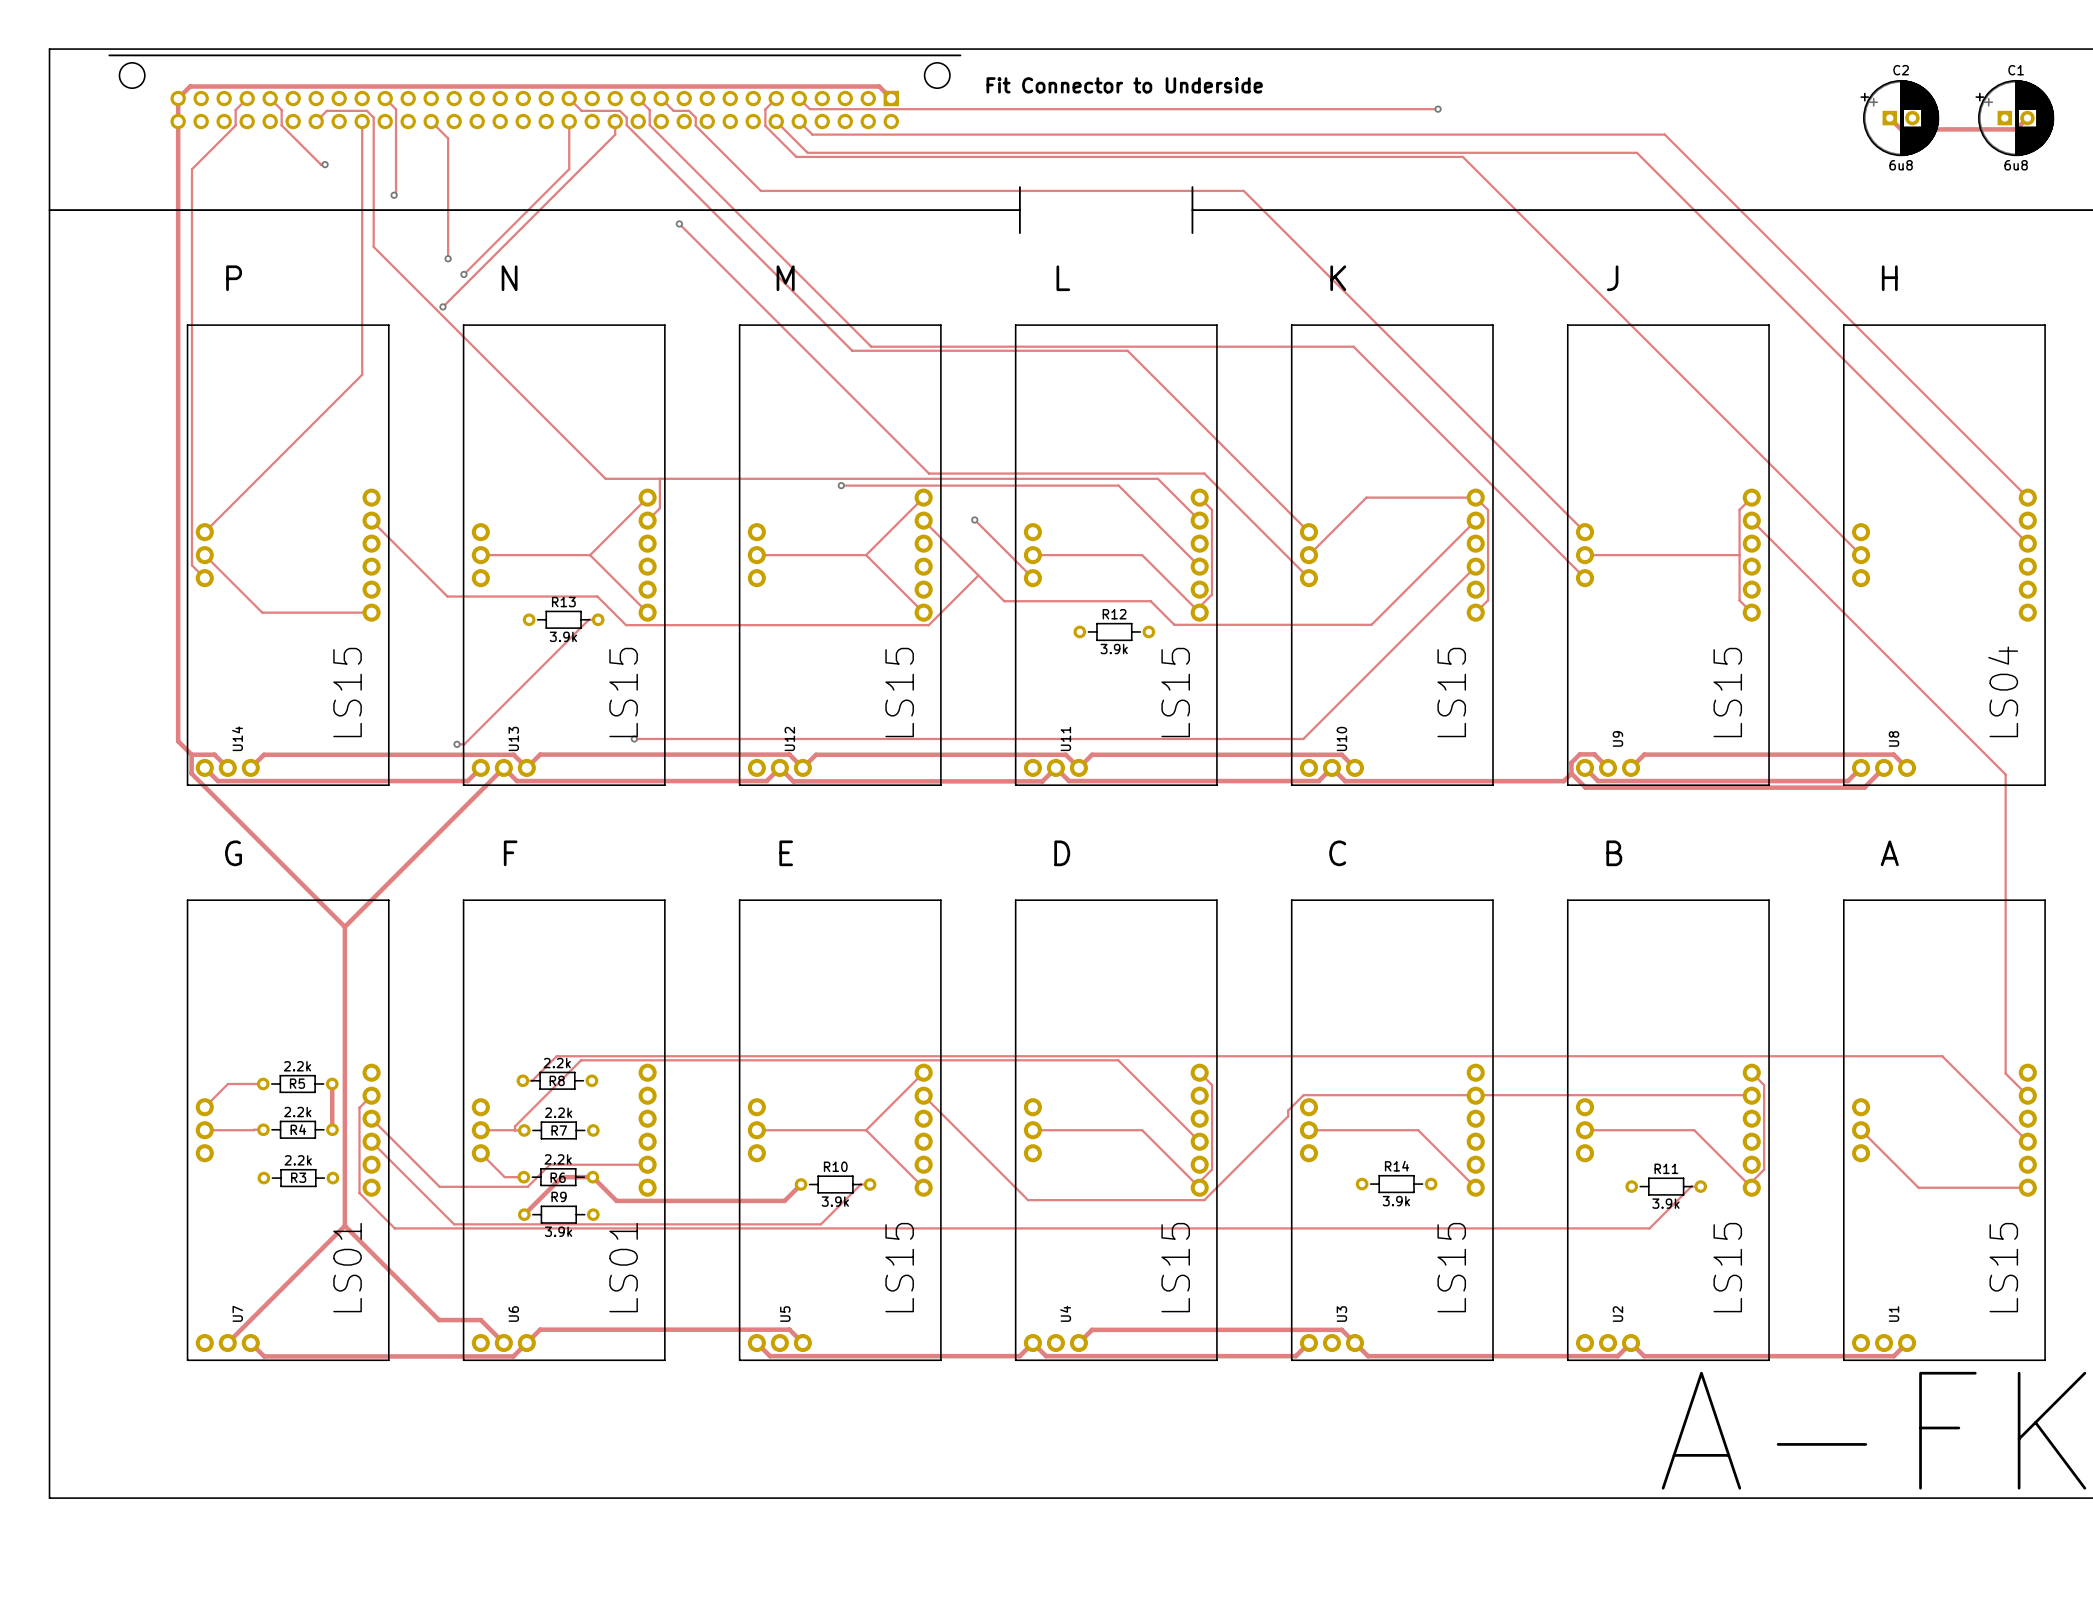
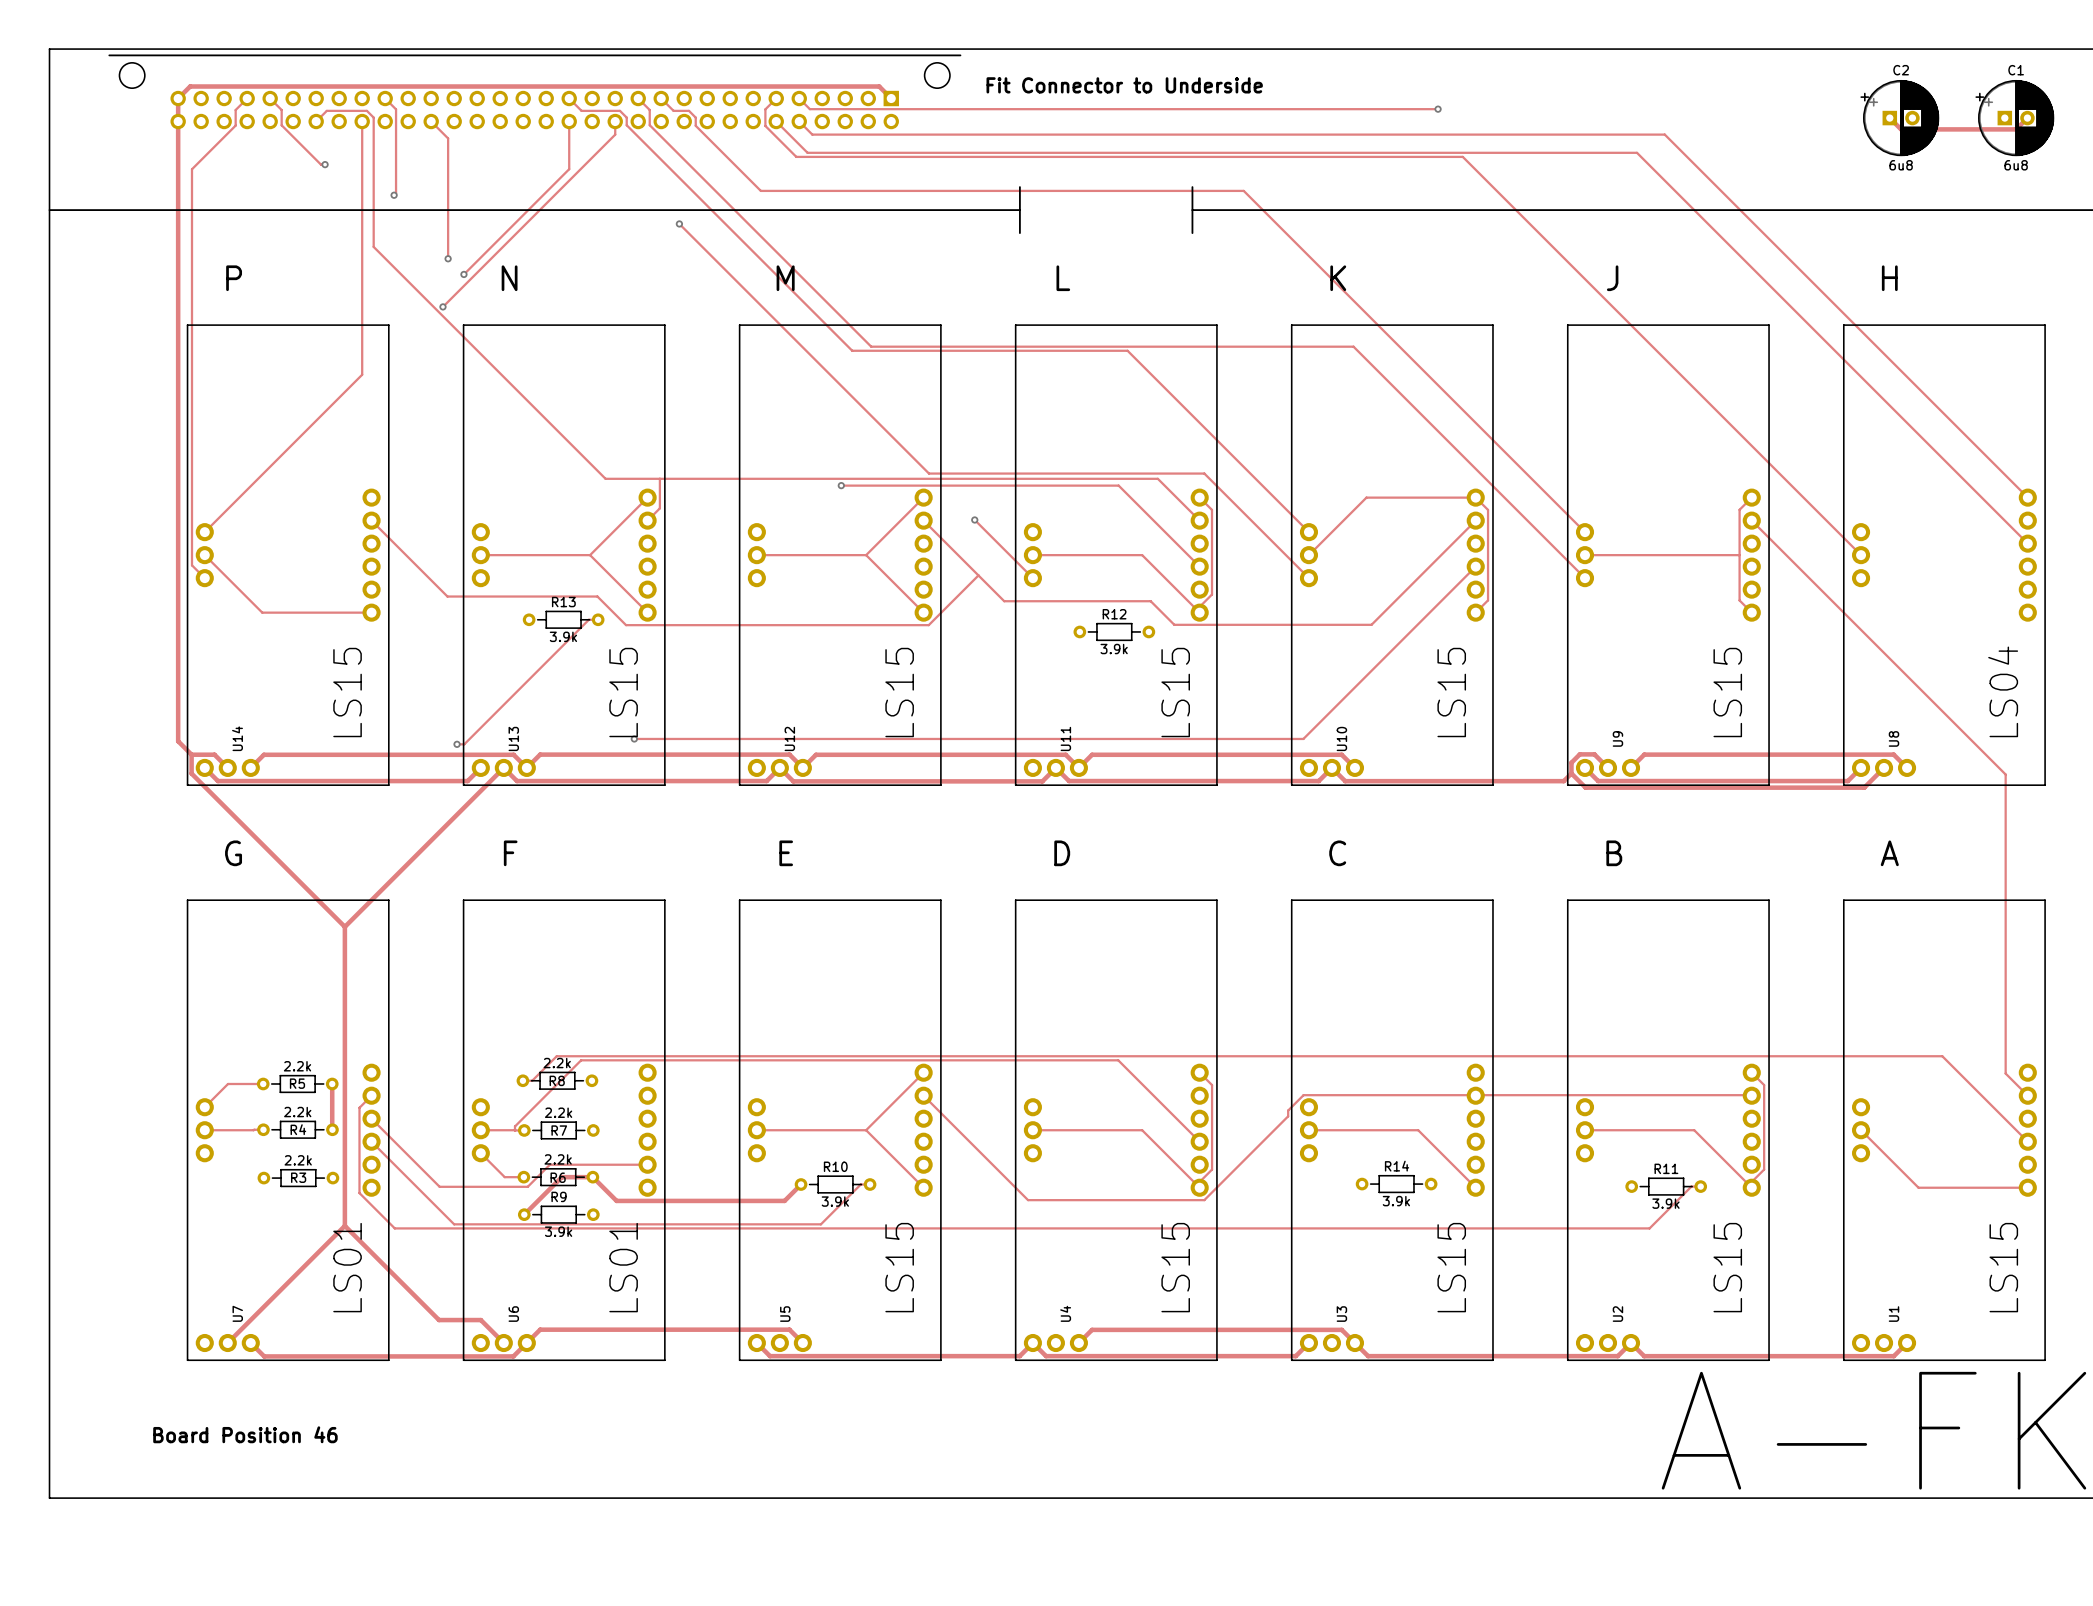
text: none -> Board Position 46 (245, 1434)

